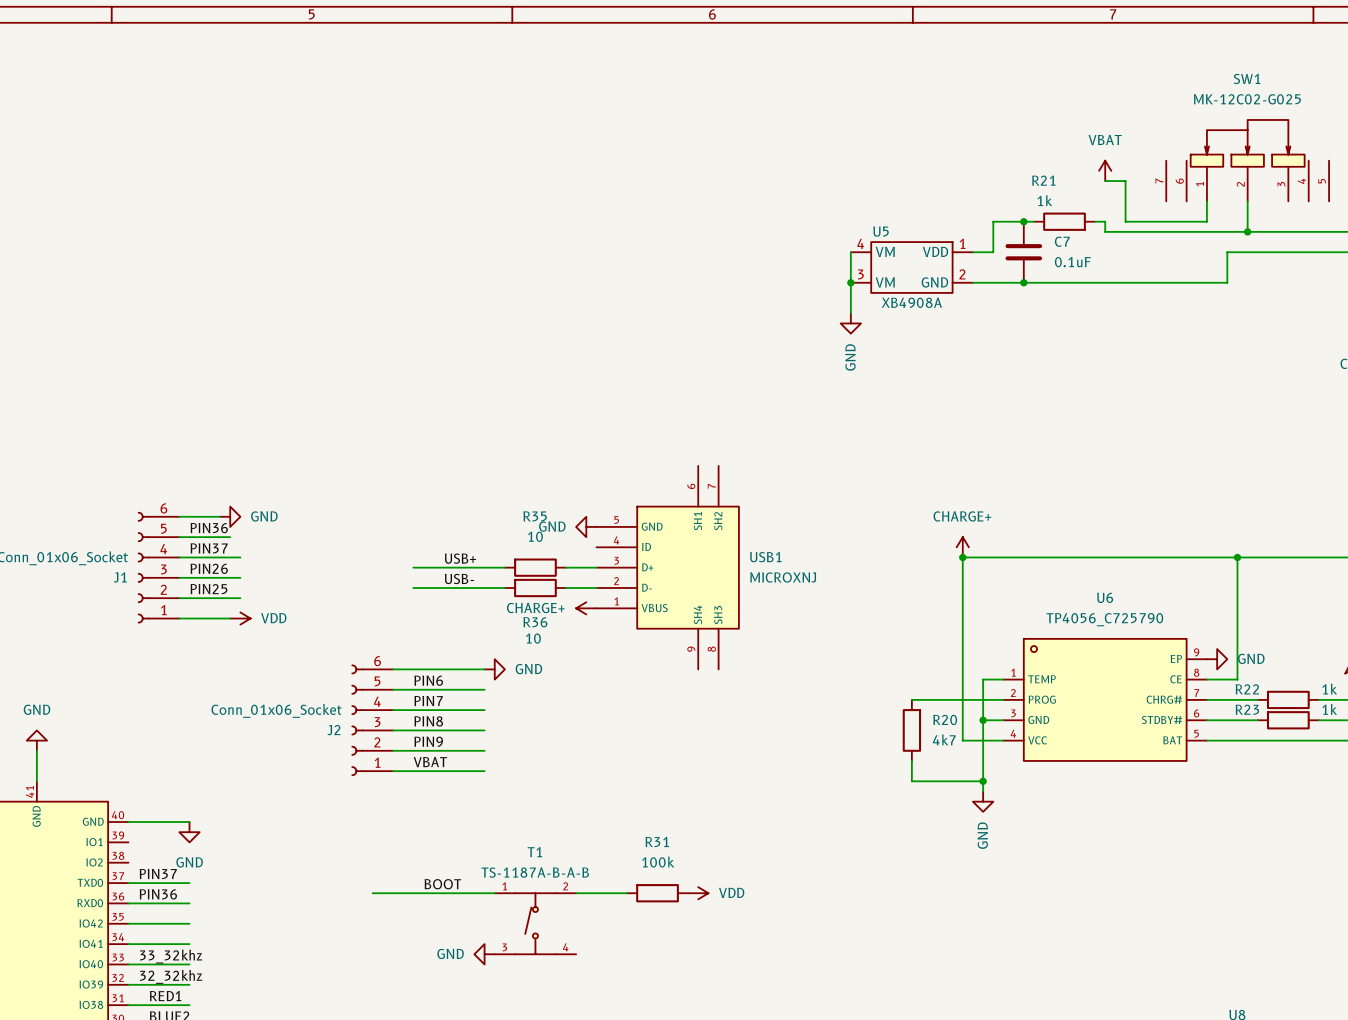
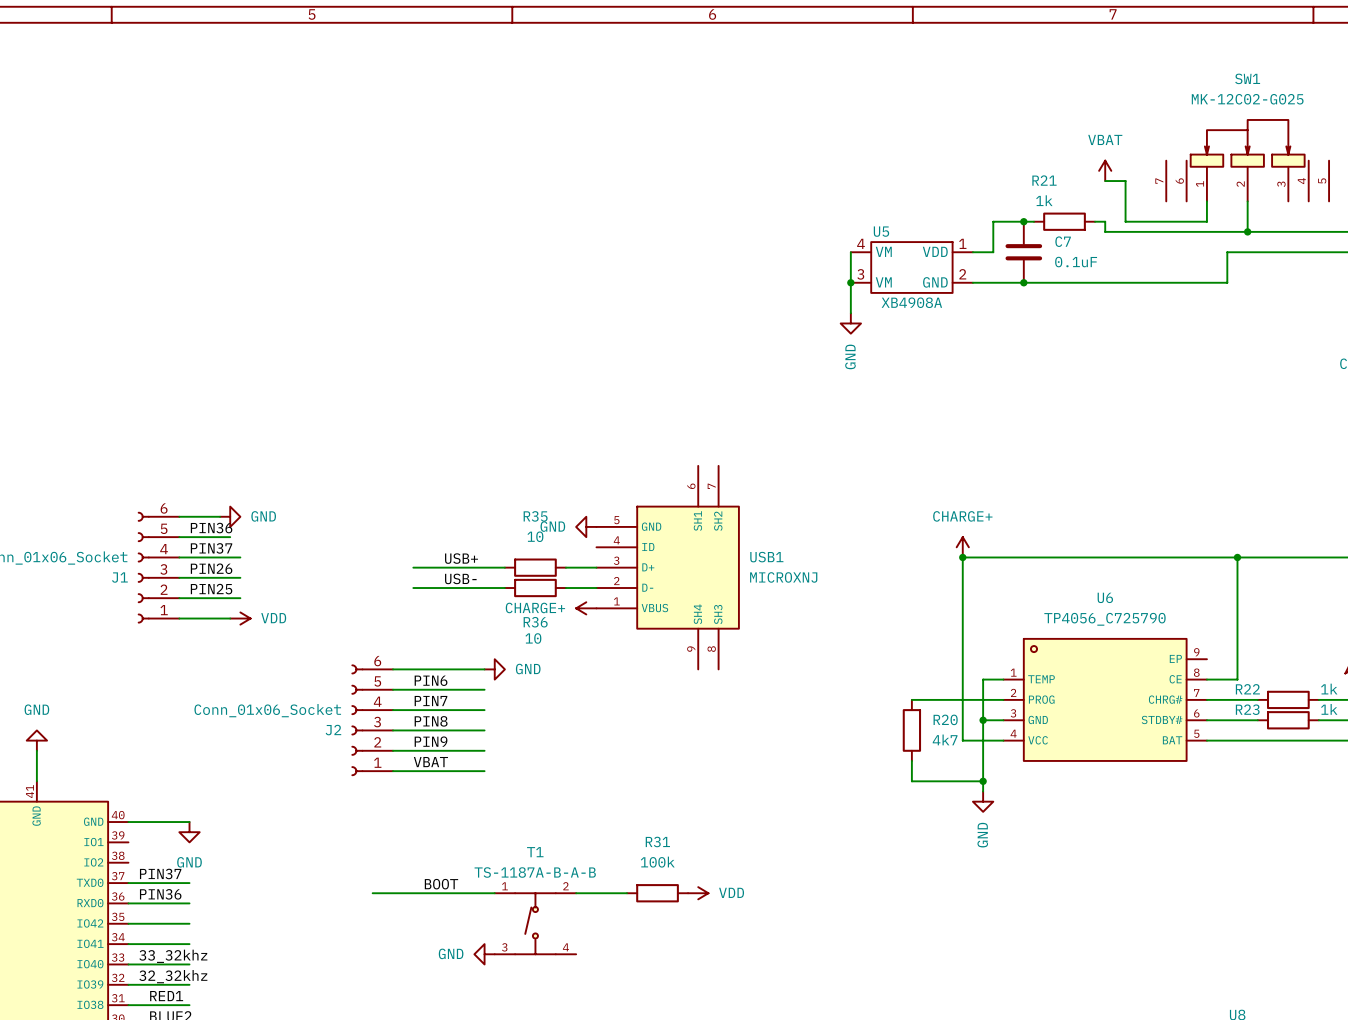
power symbol: GND (1217, 659) -> none

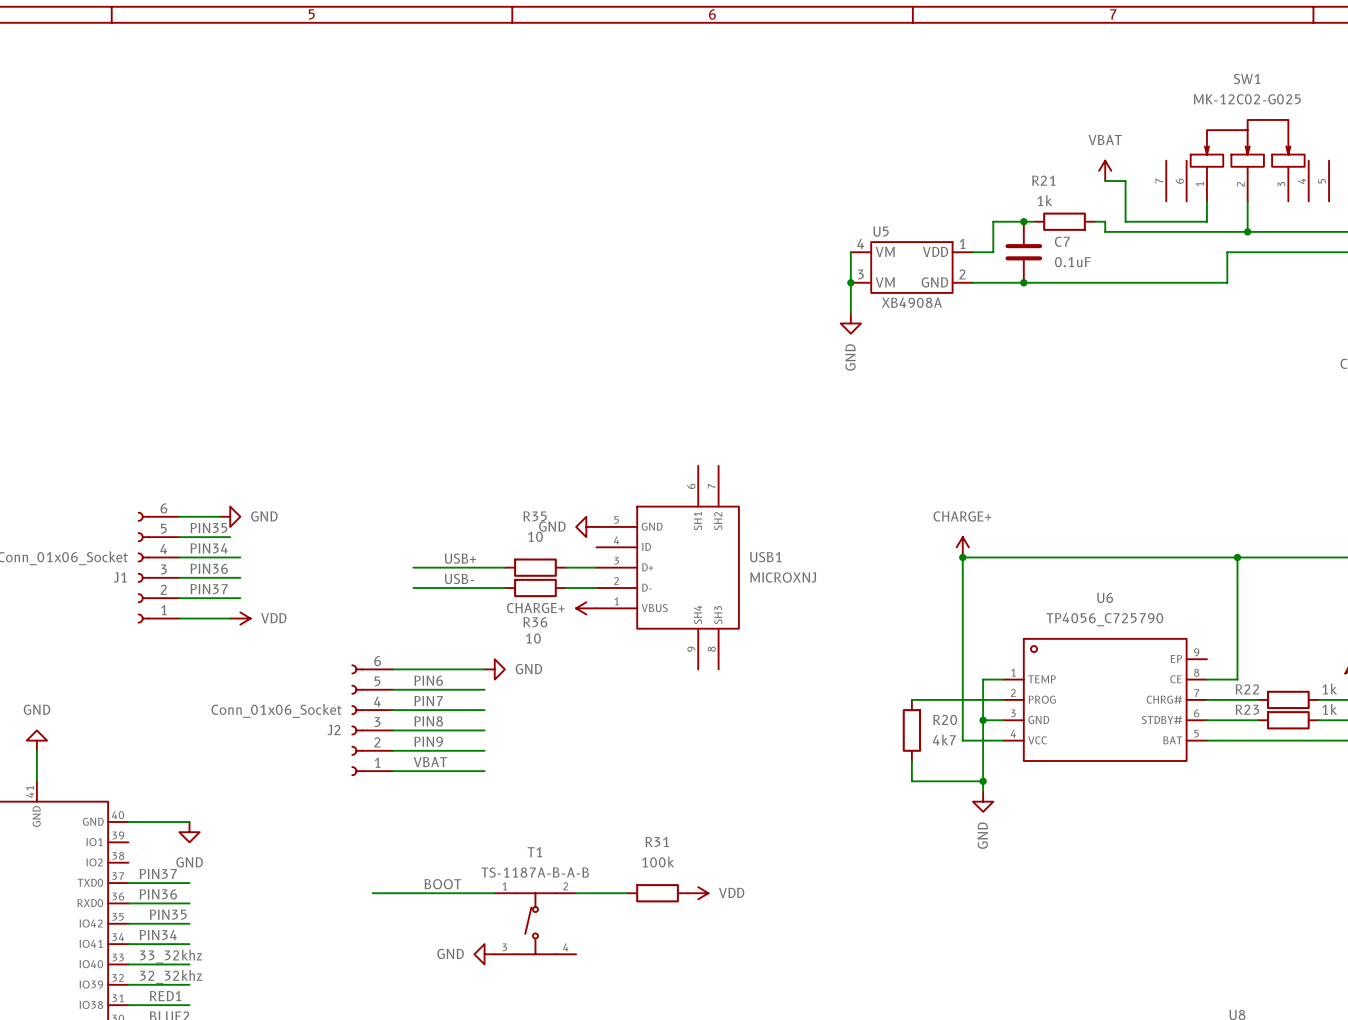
label: PIN36 (211, 528) -> PIN35 (208, 528)
label: PIN37 (211, 548) -> PIN34 (209, 548)
label: PIN26 (211, 568) -> PIN36 (209, 568)
label: PIN25 (211, 589) -> PIN37 (209, 589)
label: none -> PIN35 (168, 914)
label: none -> PIN34 (158, 935)

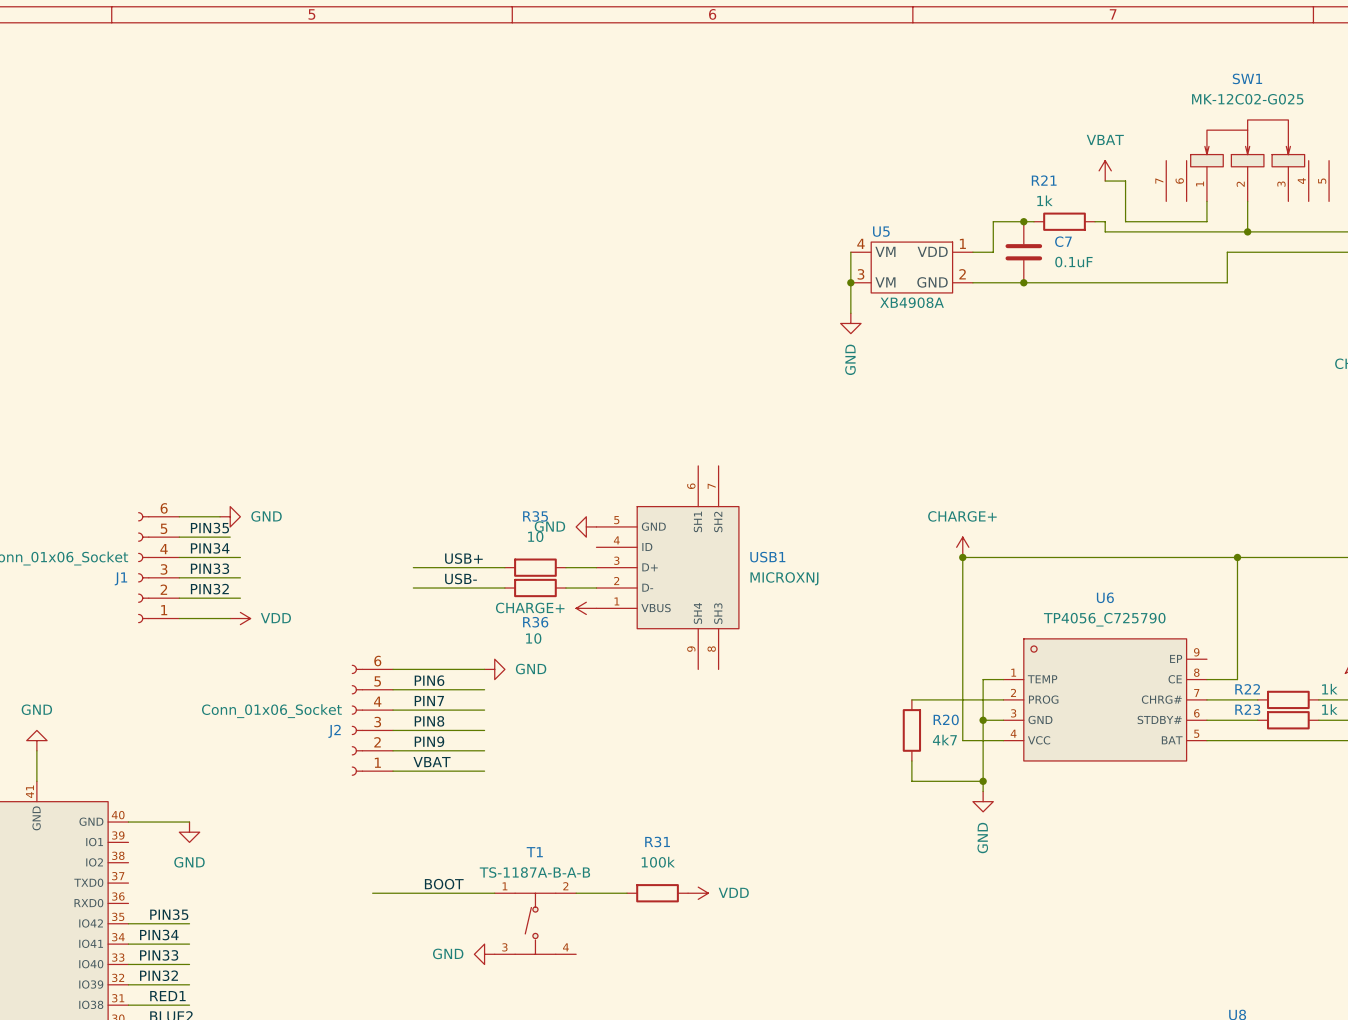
label: PIN36 (209, 568) -> PIN33 (210, 568)
label: PIN37 (209, 589) -> PIN32 (209, 589)
label: PIN37 (158, 873) -> none
wire: (128, 883) (189, 883) -> none
label: PIN36 (158, 894) -> none
wire: (128, 903) (189, 903) -> none
label: 33_32khz (171, 956) -> PIN33 (159, 955)
label: 32_32khz (171, 976) -> PIN32 (158, 975)

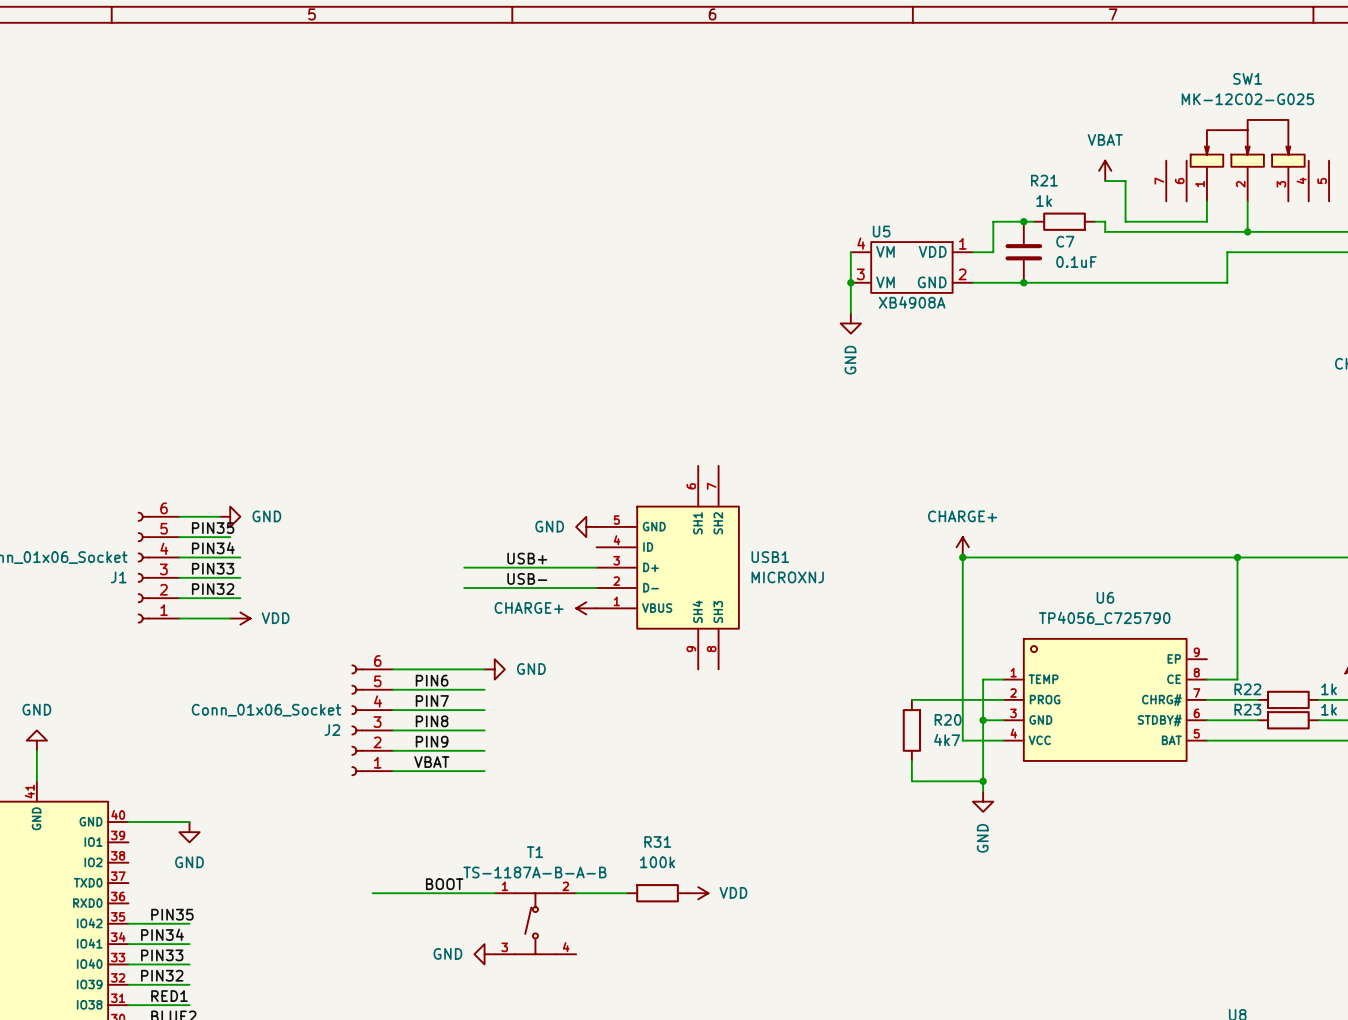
label position: USB+ (463, 558) -> USB+ (527, 558)
wire: (413, 567) (464, 567) -> none
wire: none -> (504, 567) (565, 567)
R35: 10 (535, 567) -> none
label position: USB- (460, 578) -> USB- (527, 578)
wire: (413, 588) (464, 588) -> none
wire: none -> (504, 588) (565, 588)
R36: 10 (535, 588) -> none

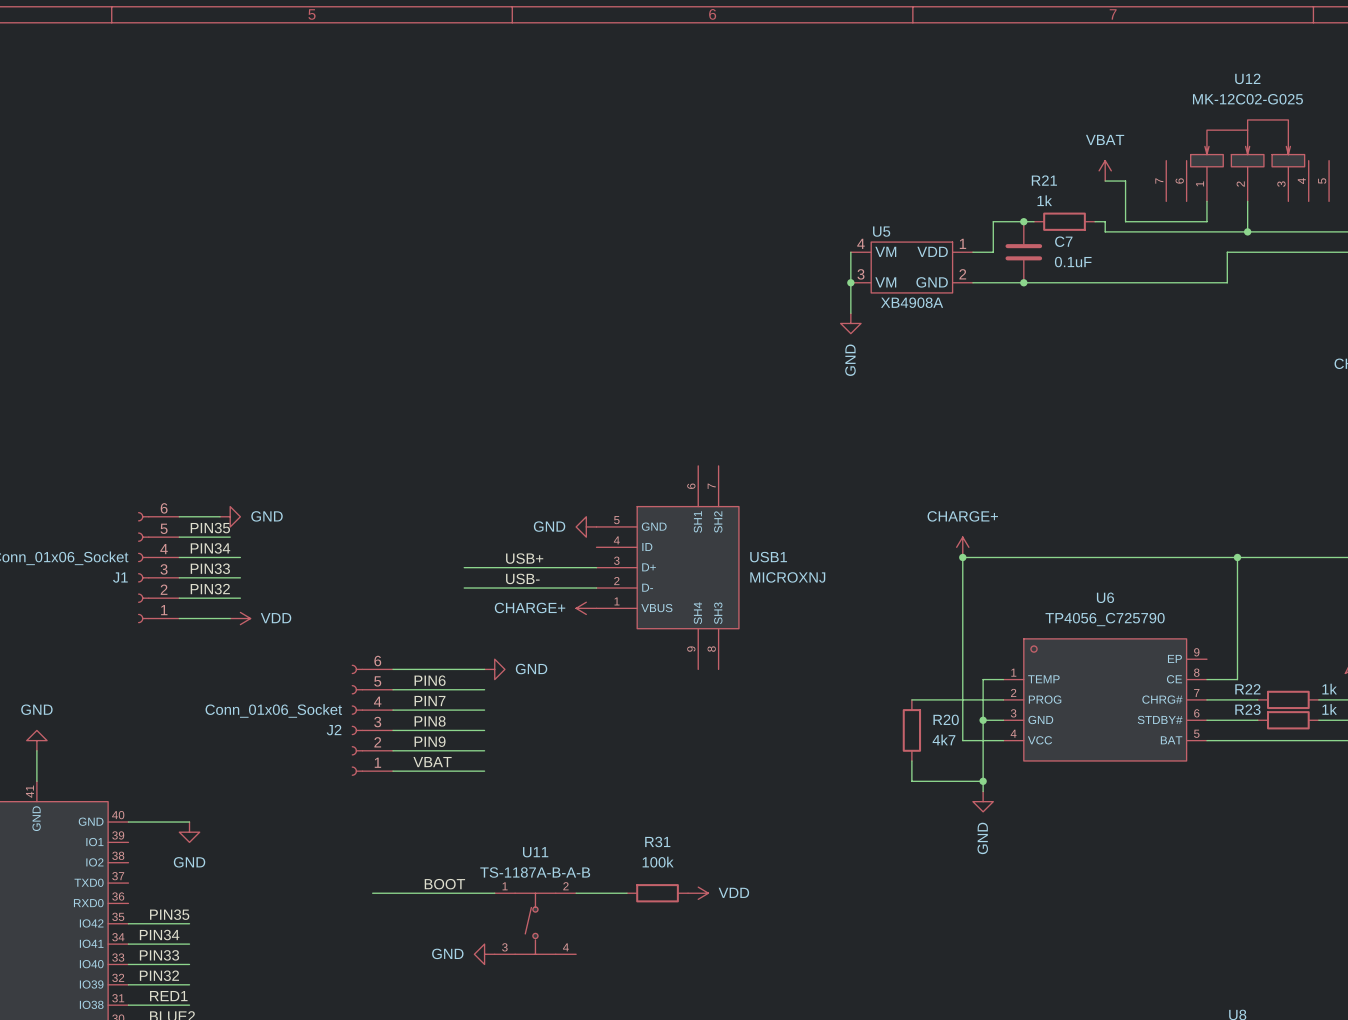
SW1 name: SW1 (1247, 78) -> U12 (1247, 78)
T1 name: T1 (534, 852) -> U11 (535, 852)

